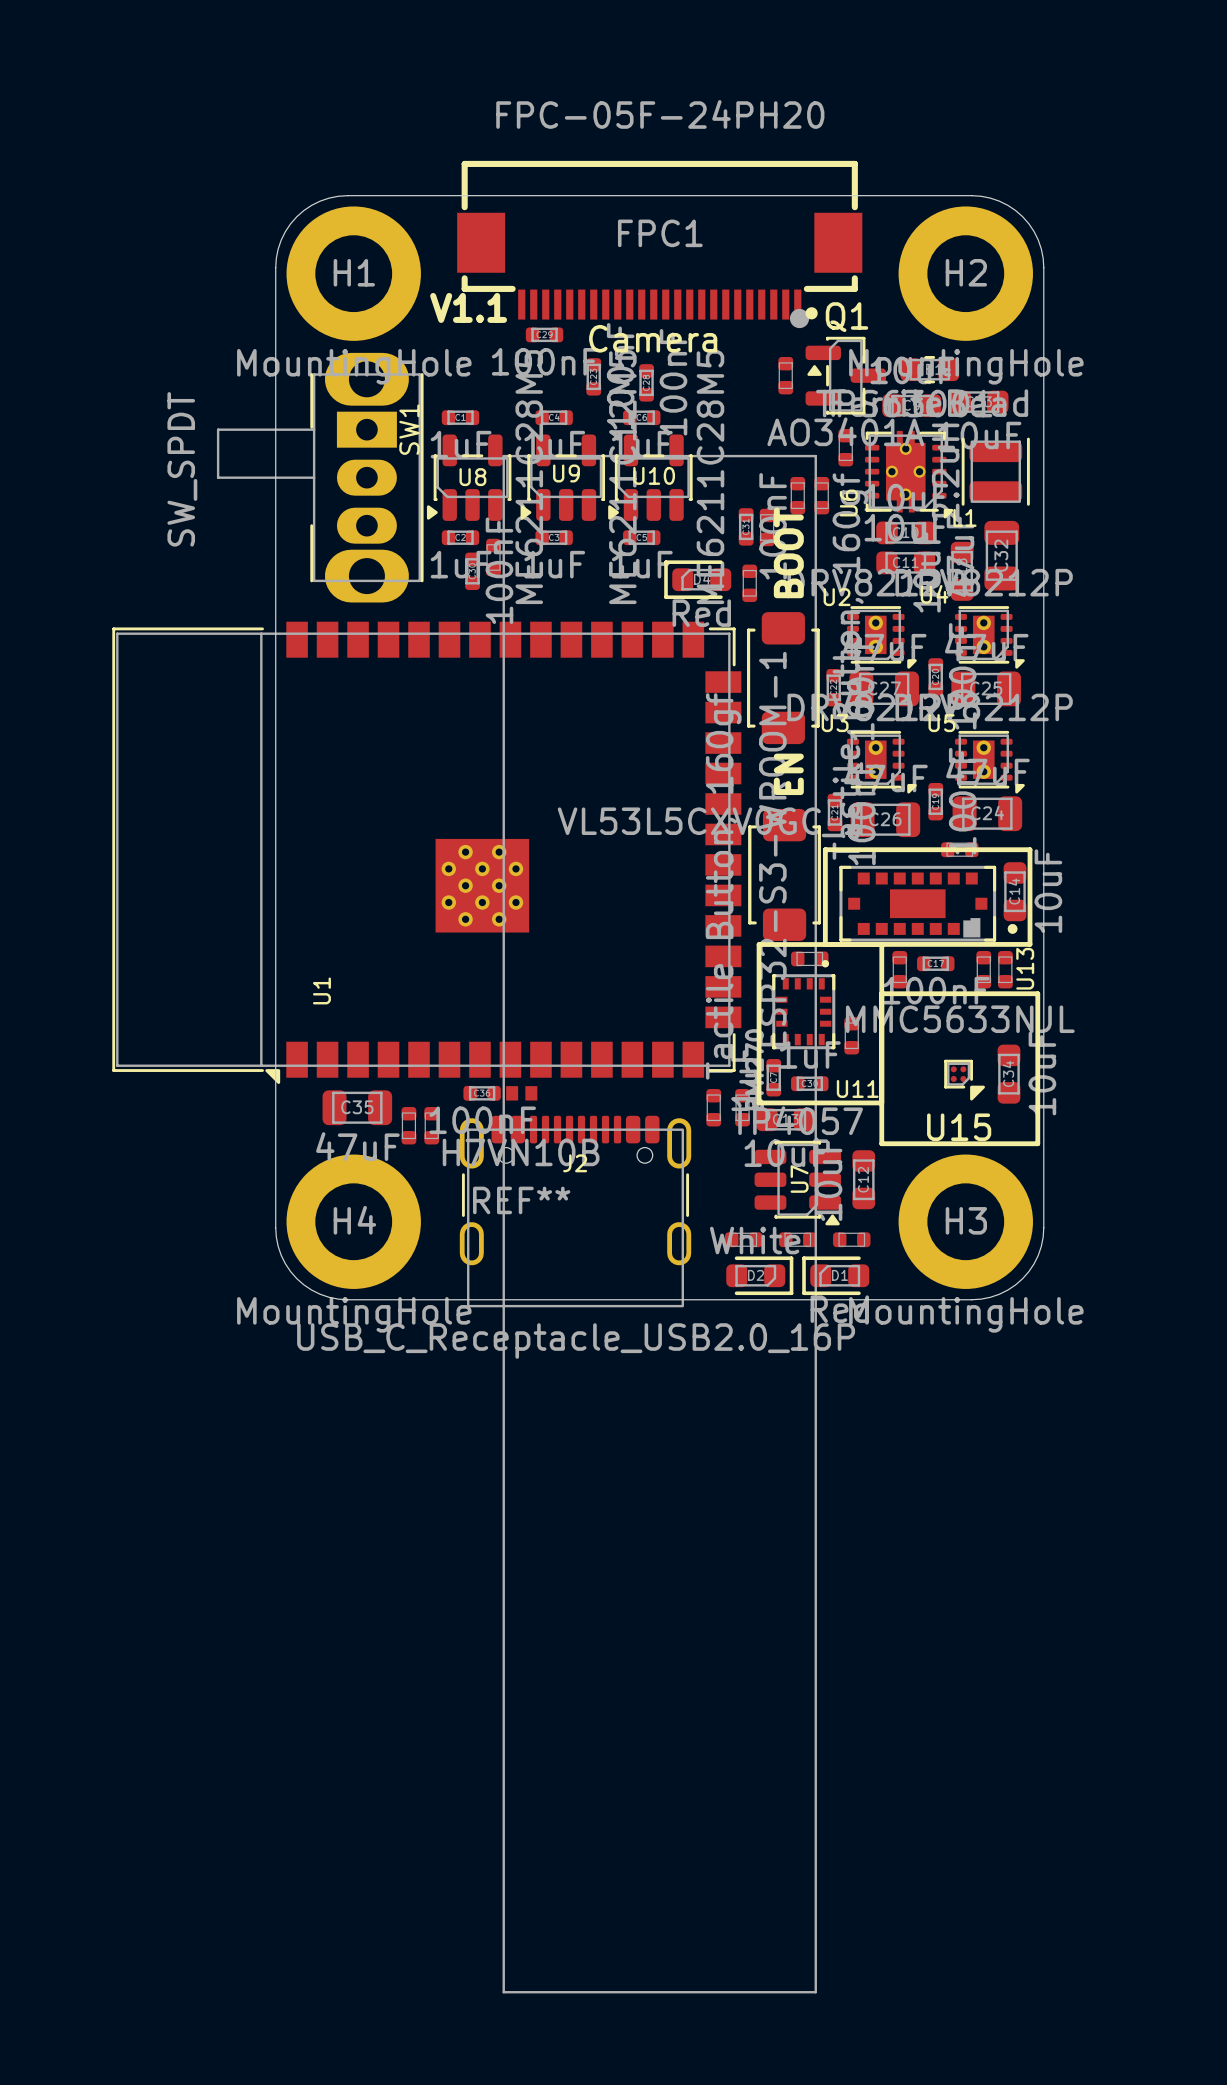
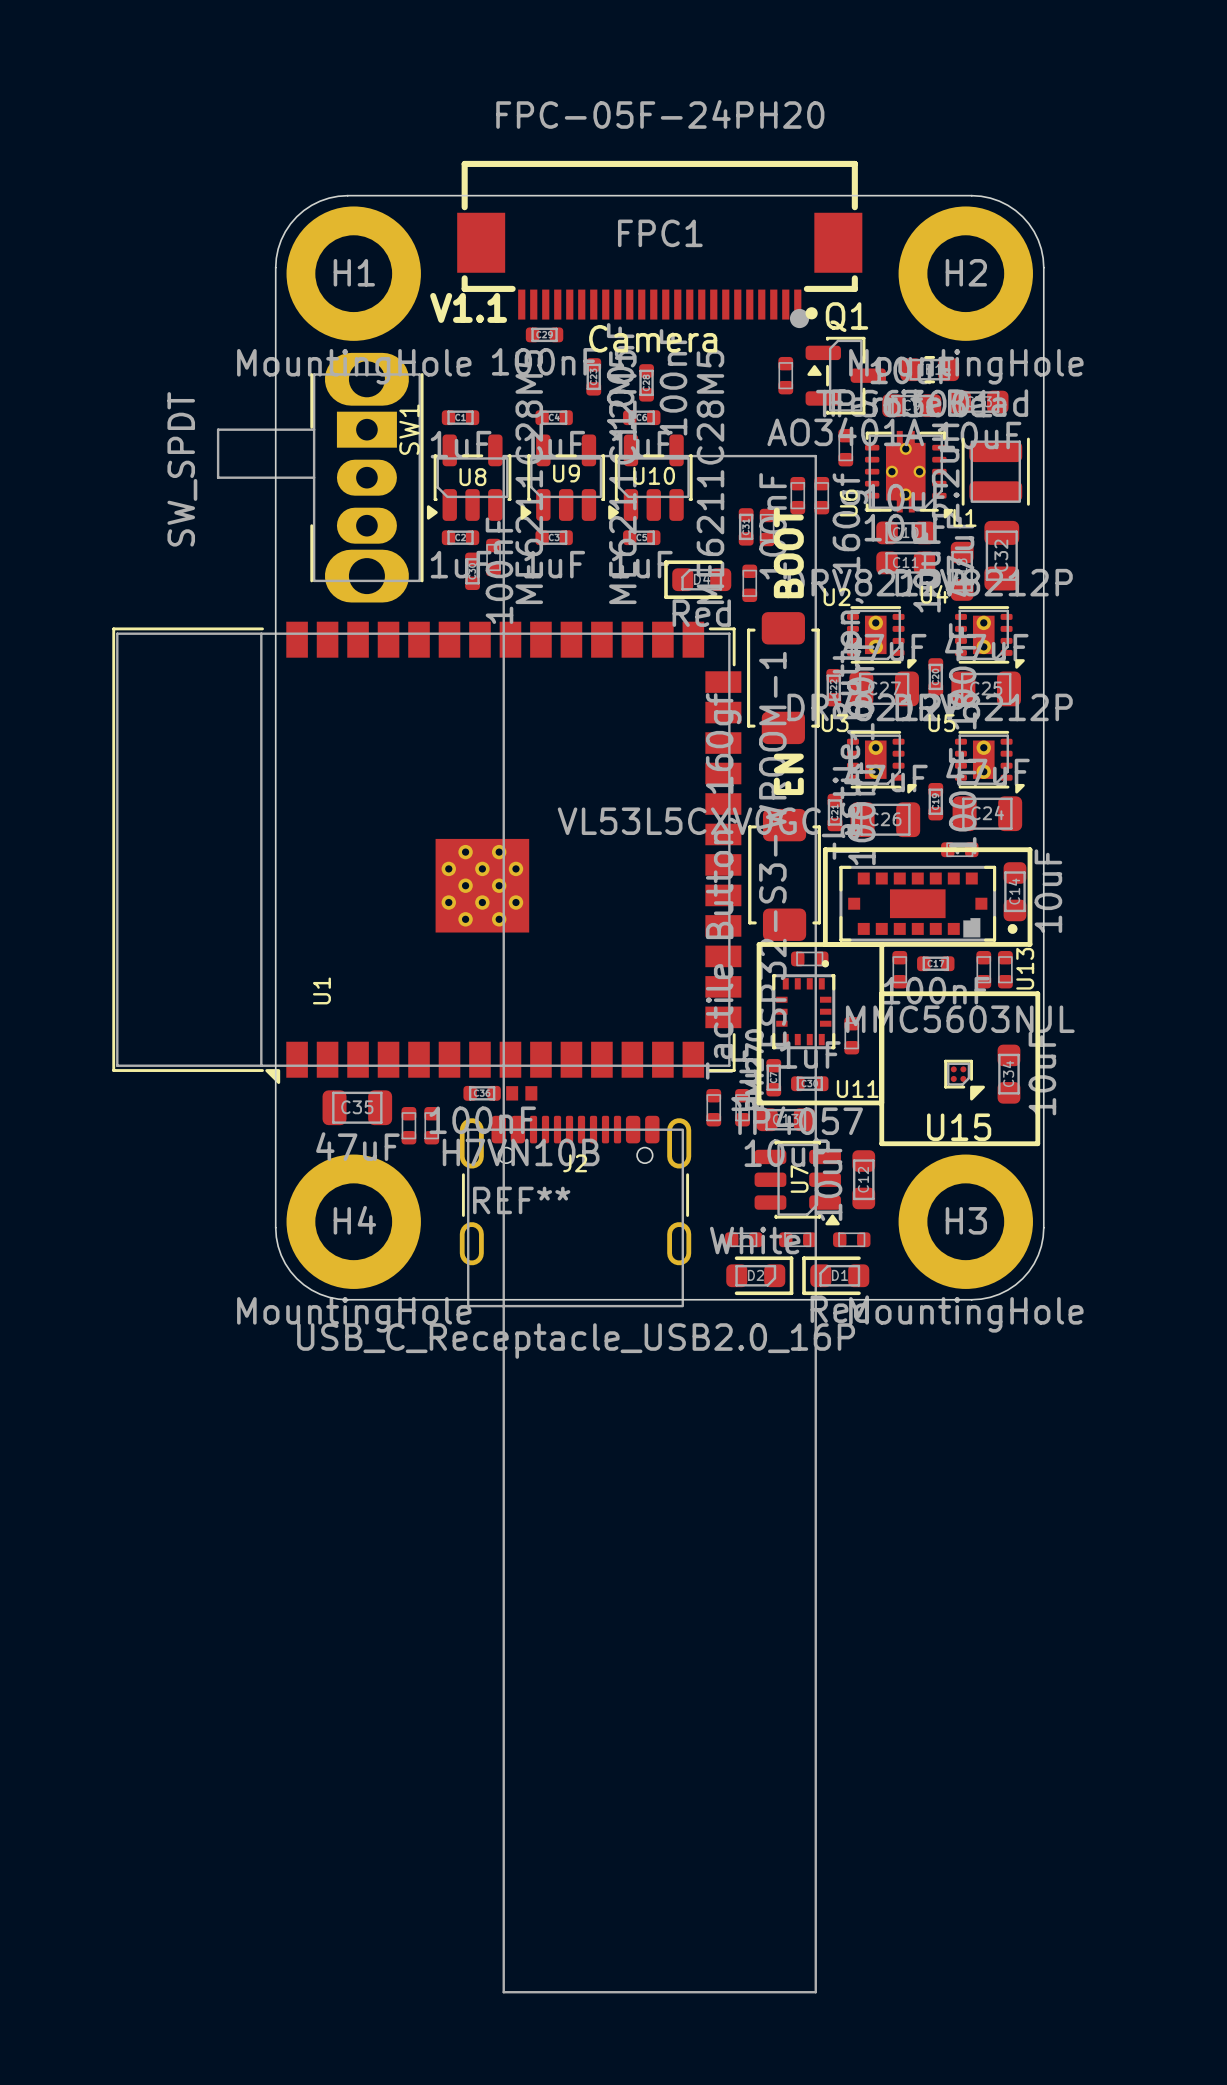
U15 value: MMC5633NJL (960, 1019) -> MMC5603NJL (960, 1019)

